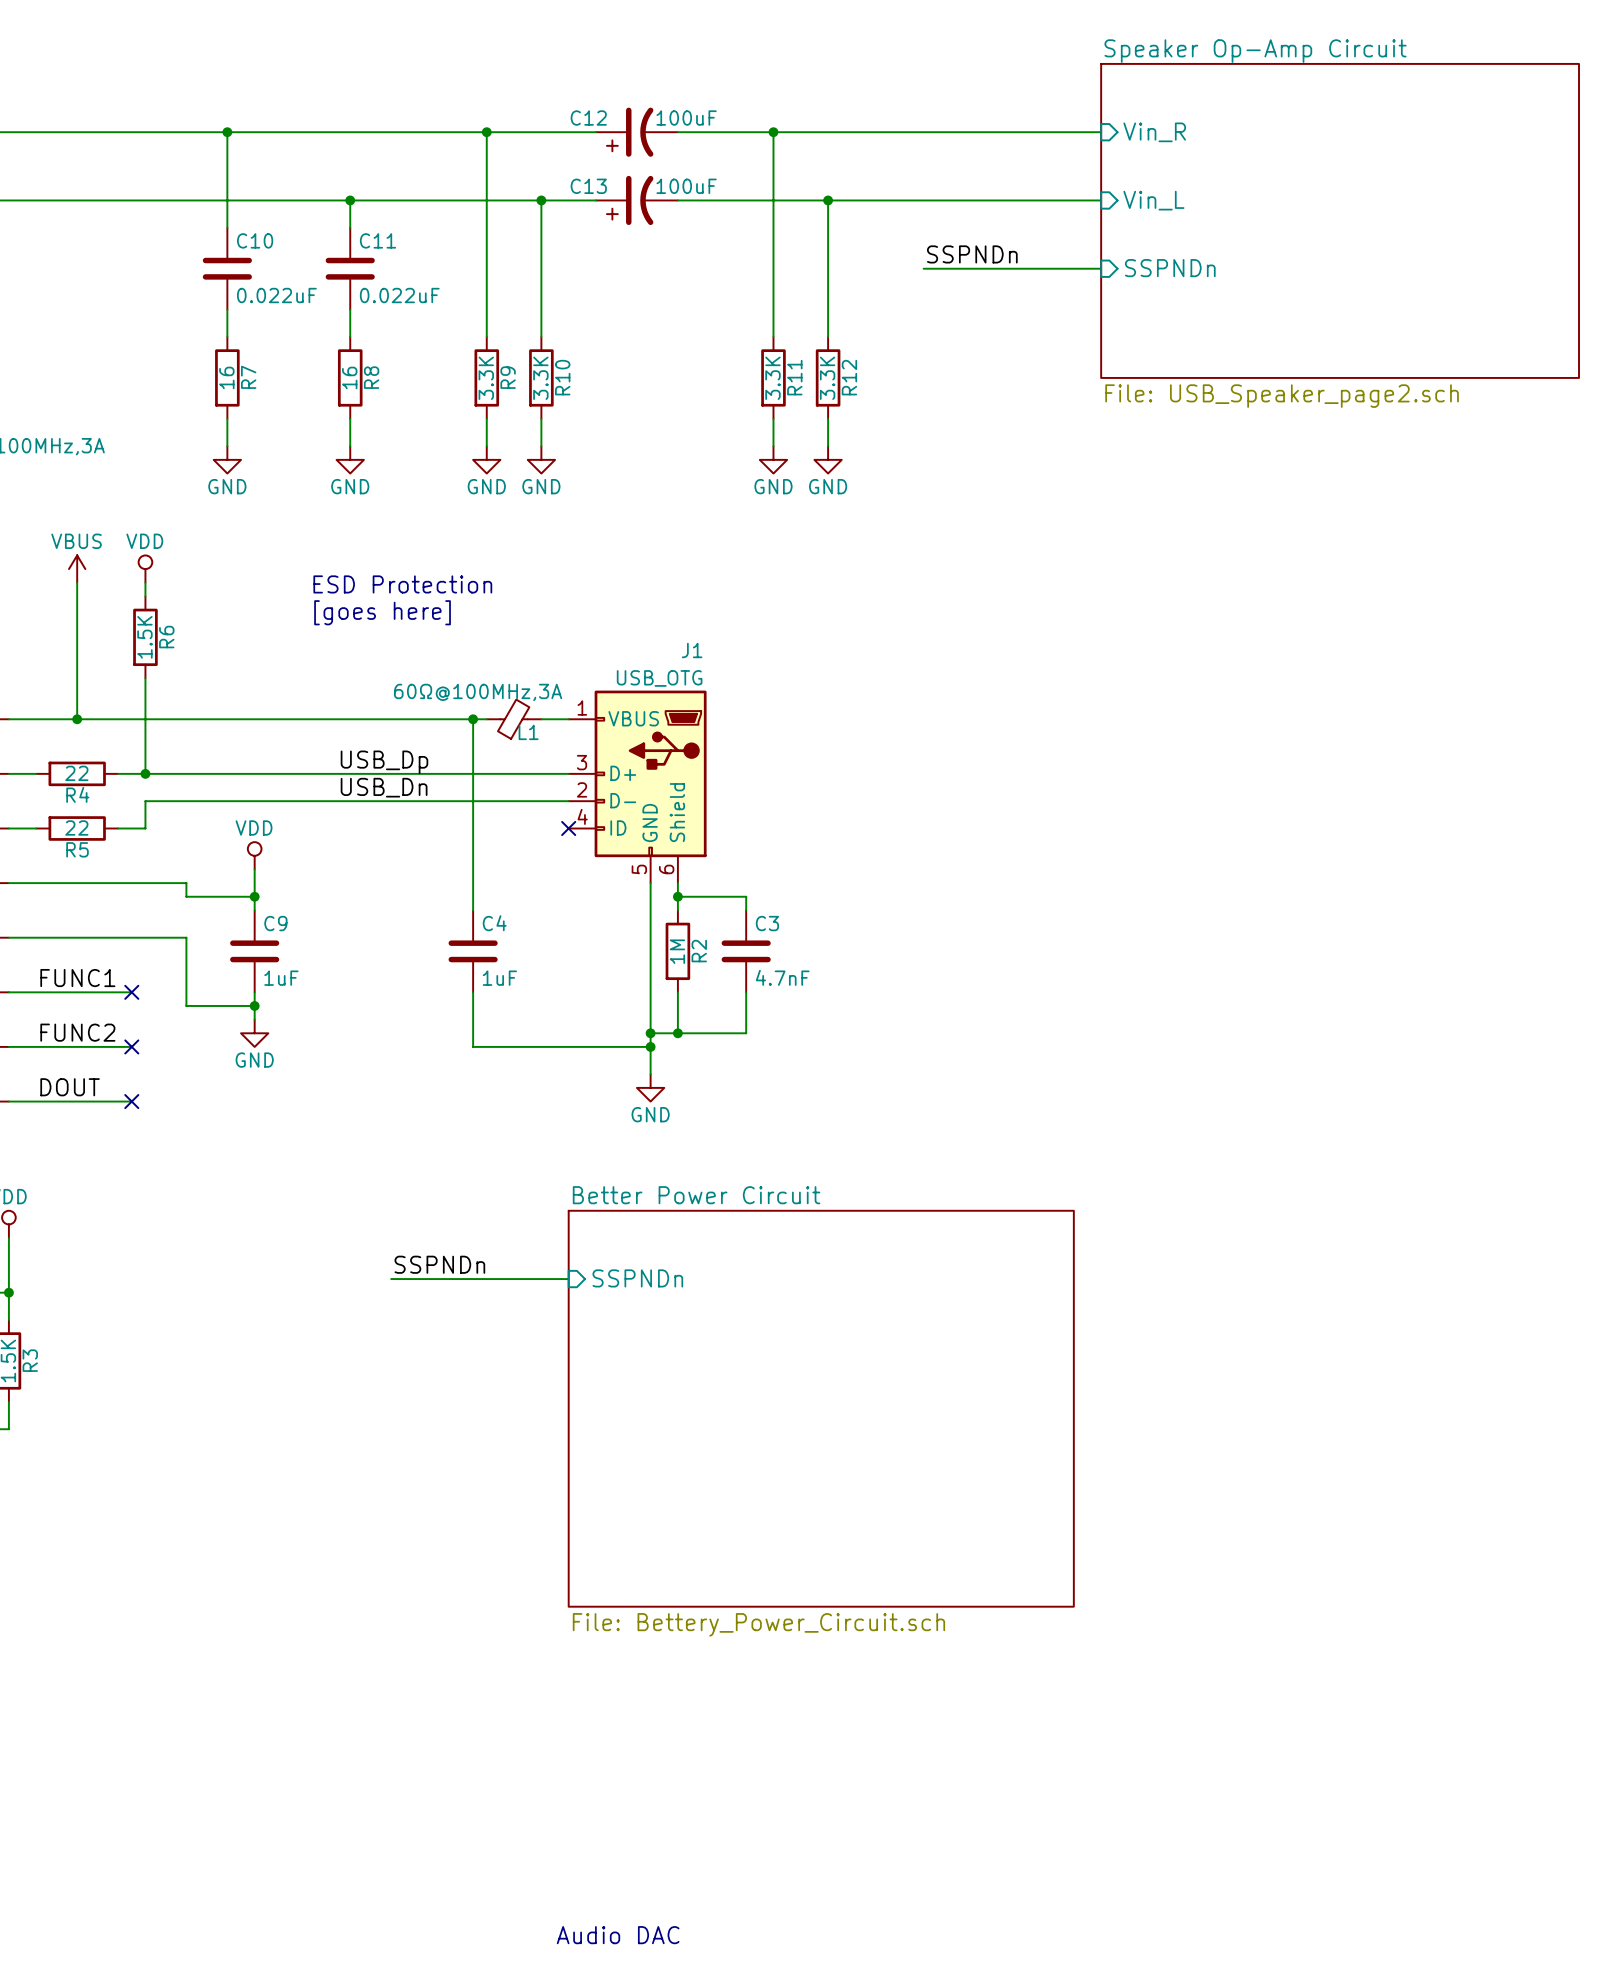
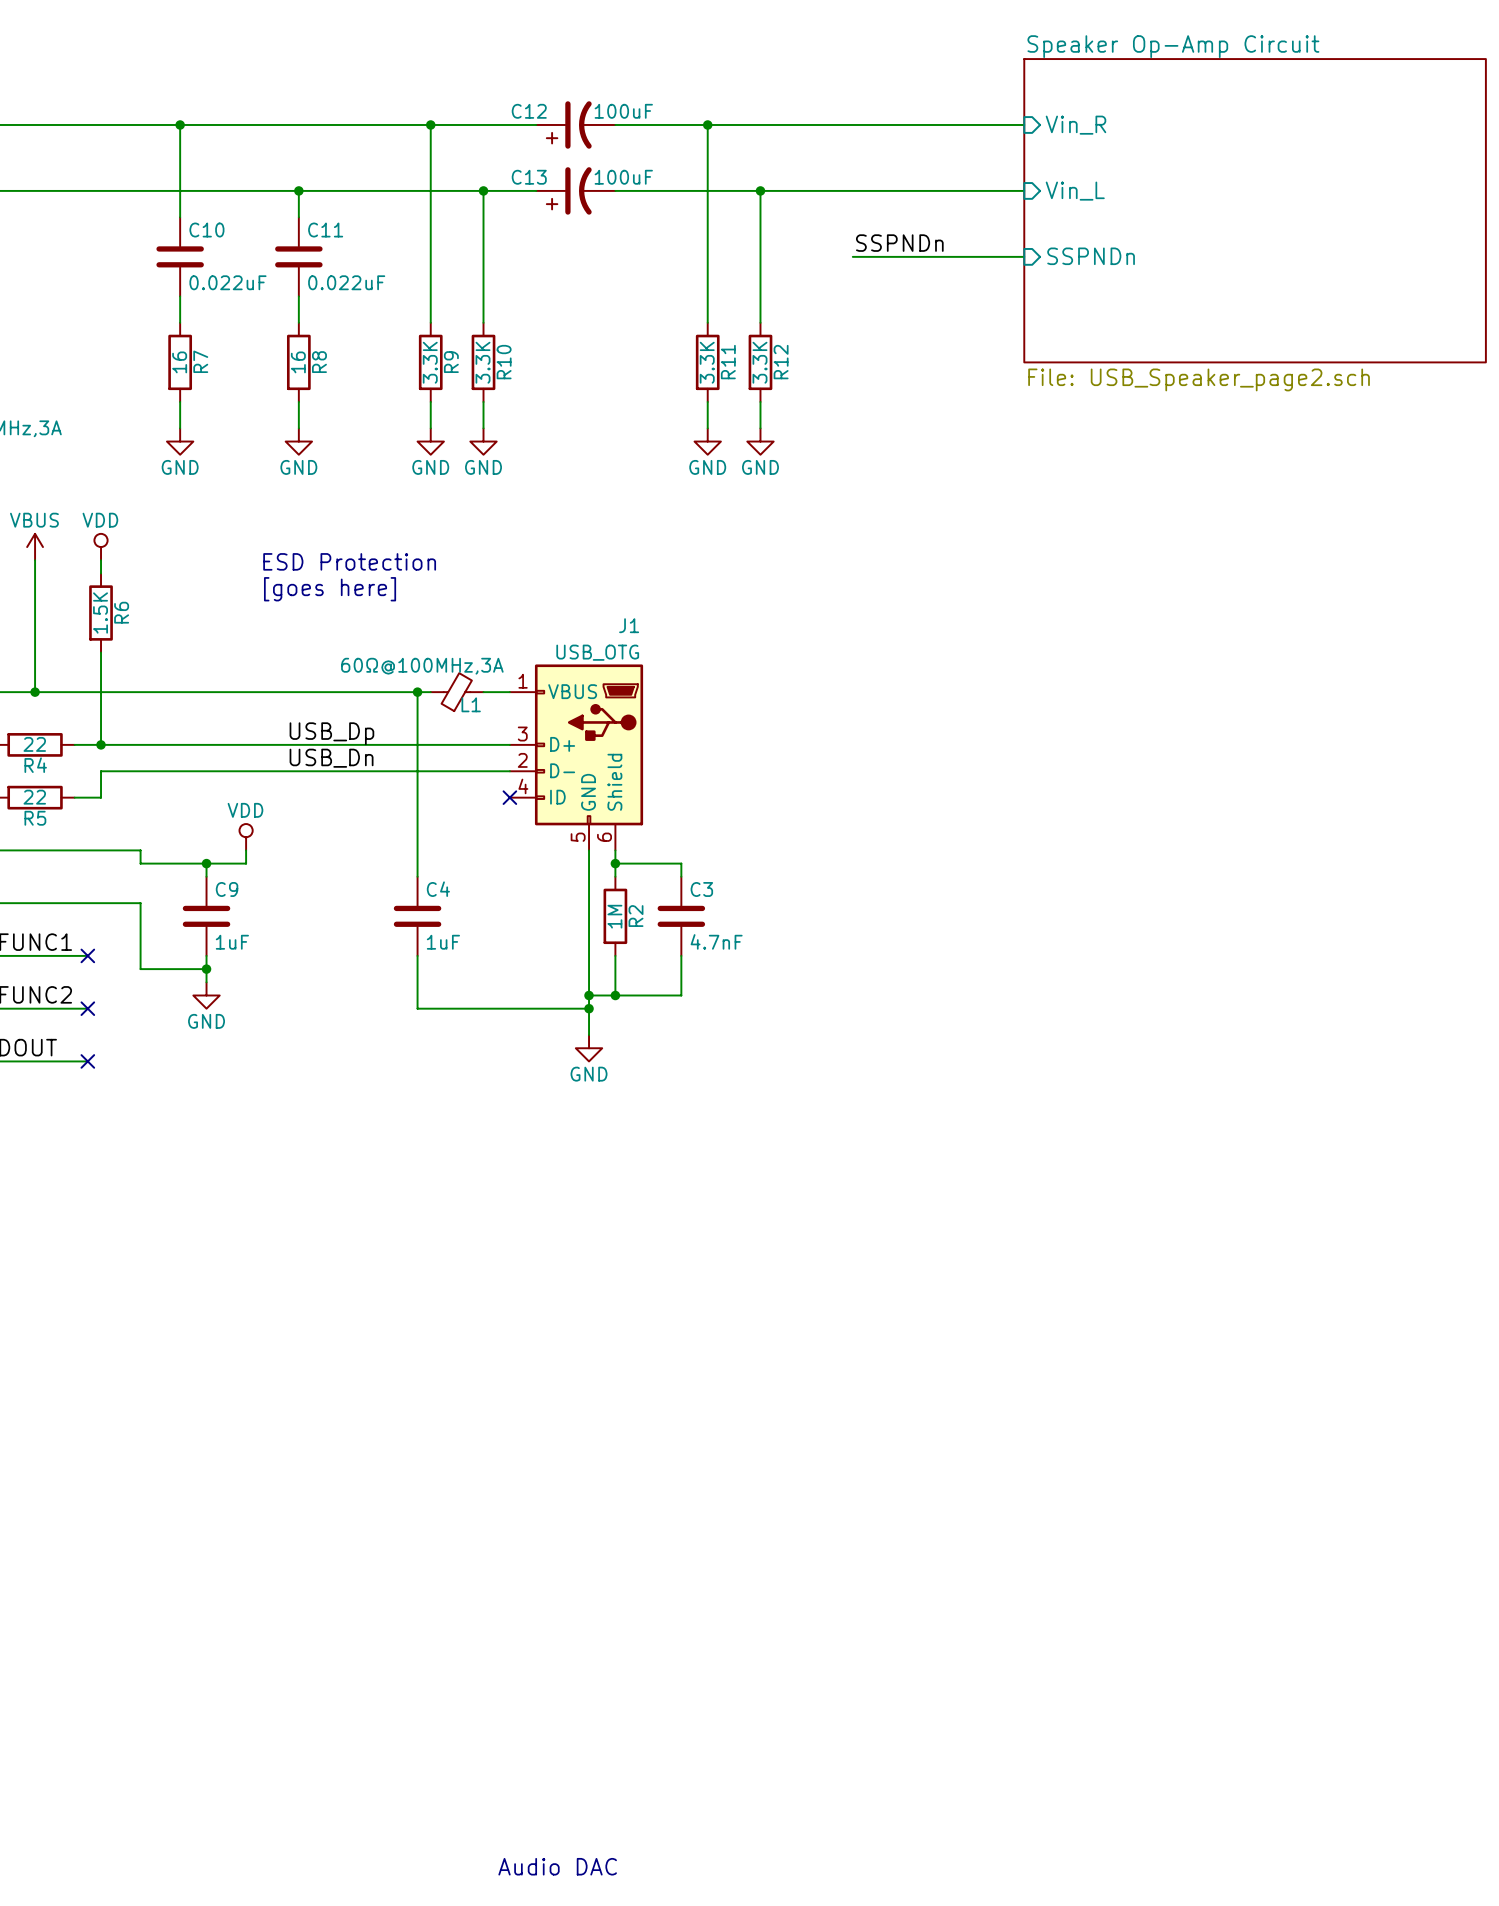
power symbol position: VDD (254, 855) -> VDD (246, 837)
wire: (254, 869) (254, 896) -> (246, 850) (246, 863) (206, 863)
label: SSPNDn (439, 1264) -> none
sheet pin: SSPNDn (637, 1278) -> none
wire: (391, 1279) (568, 1279) -> none
sheet Better Power Circuit: File: Bettery_Power_Circuit.sch (821, 1408) -> none

